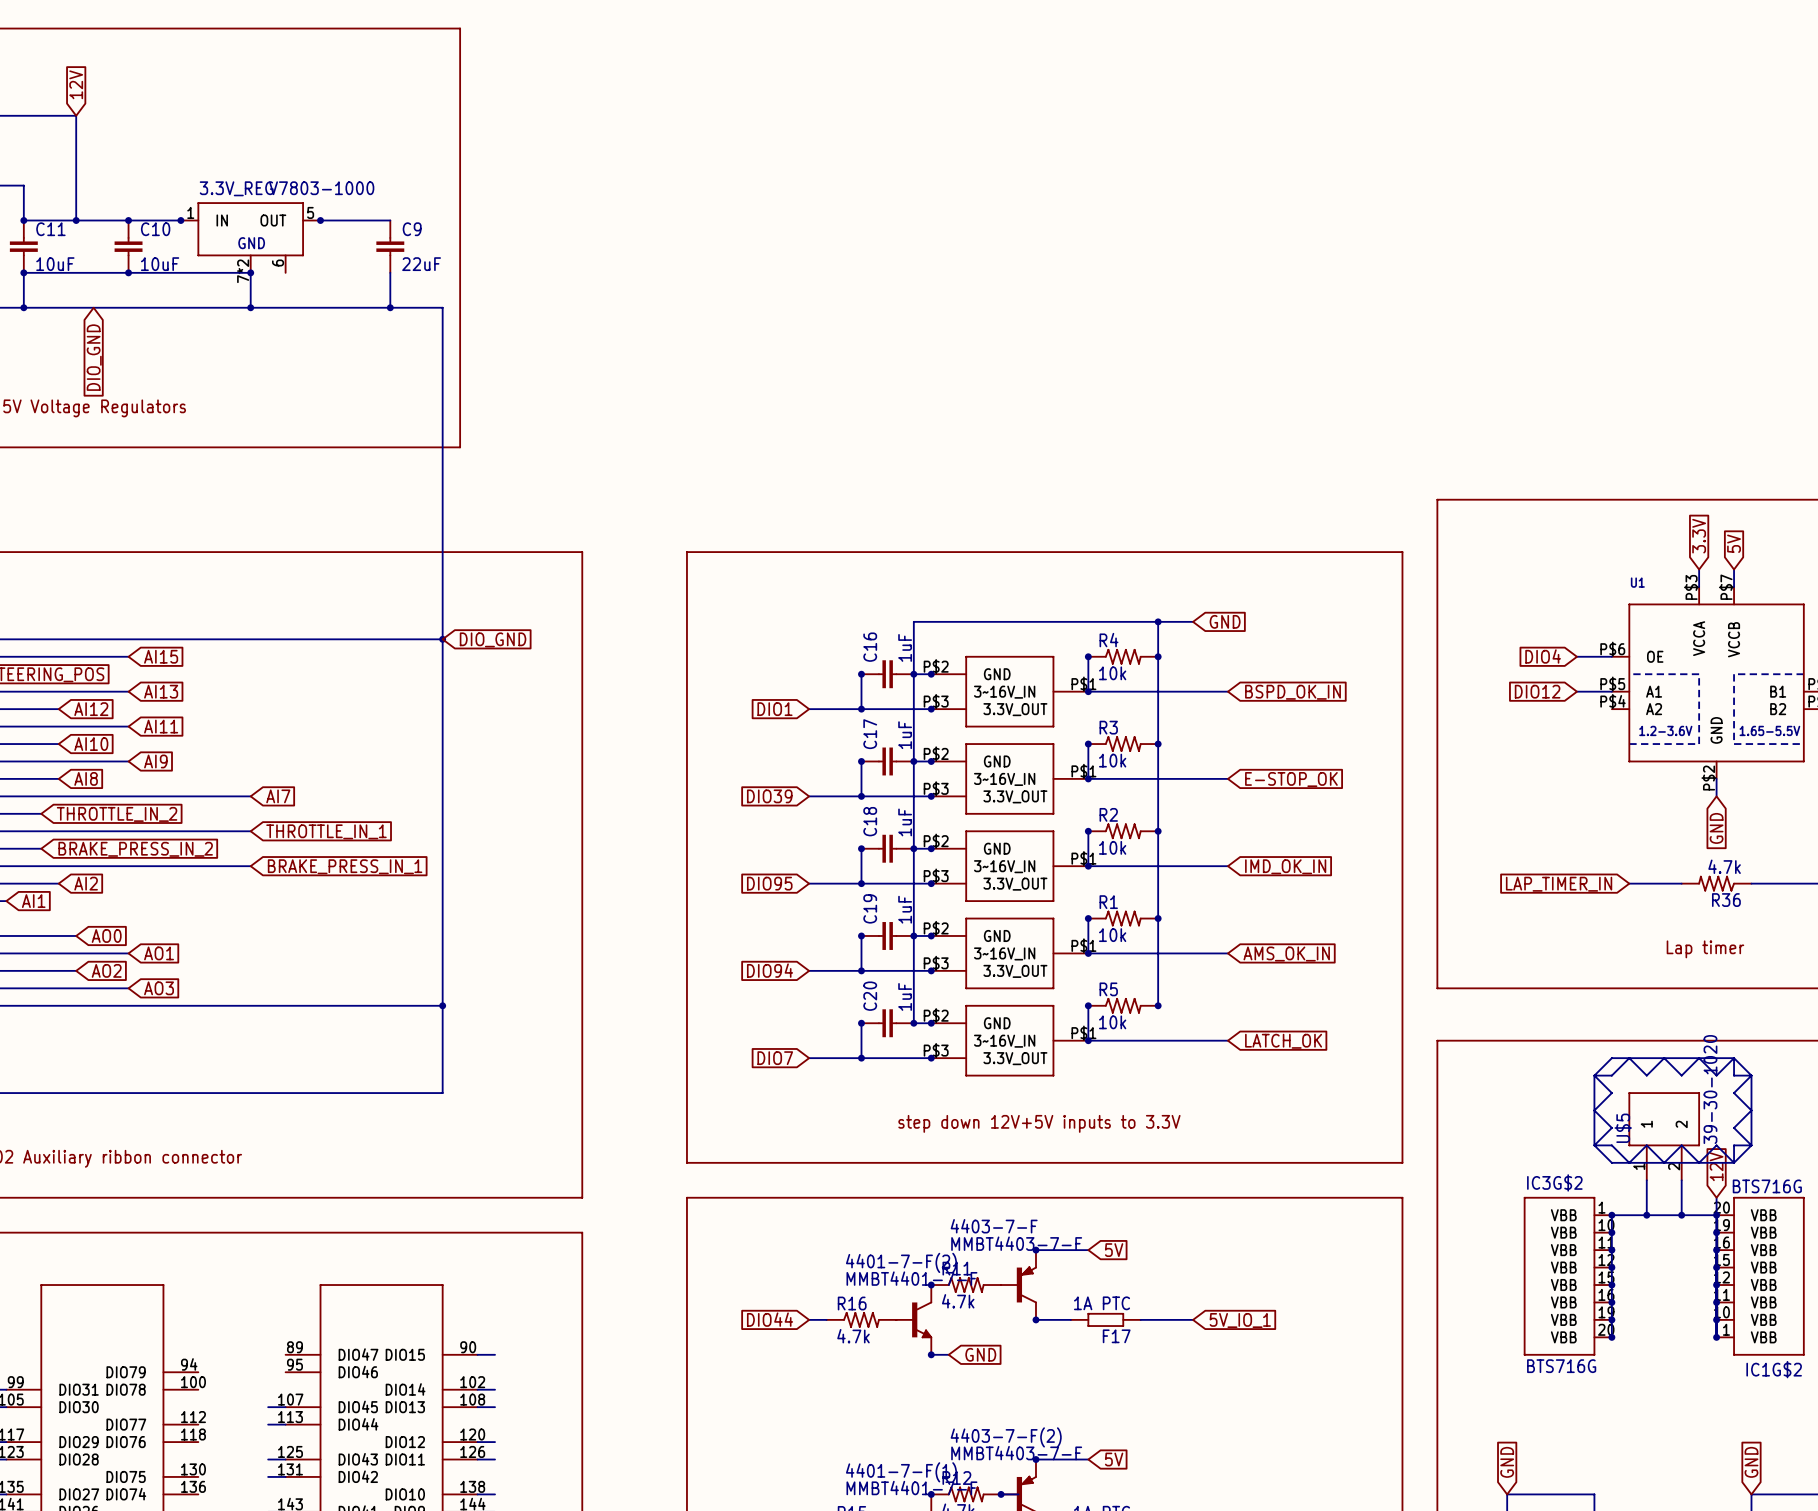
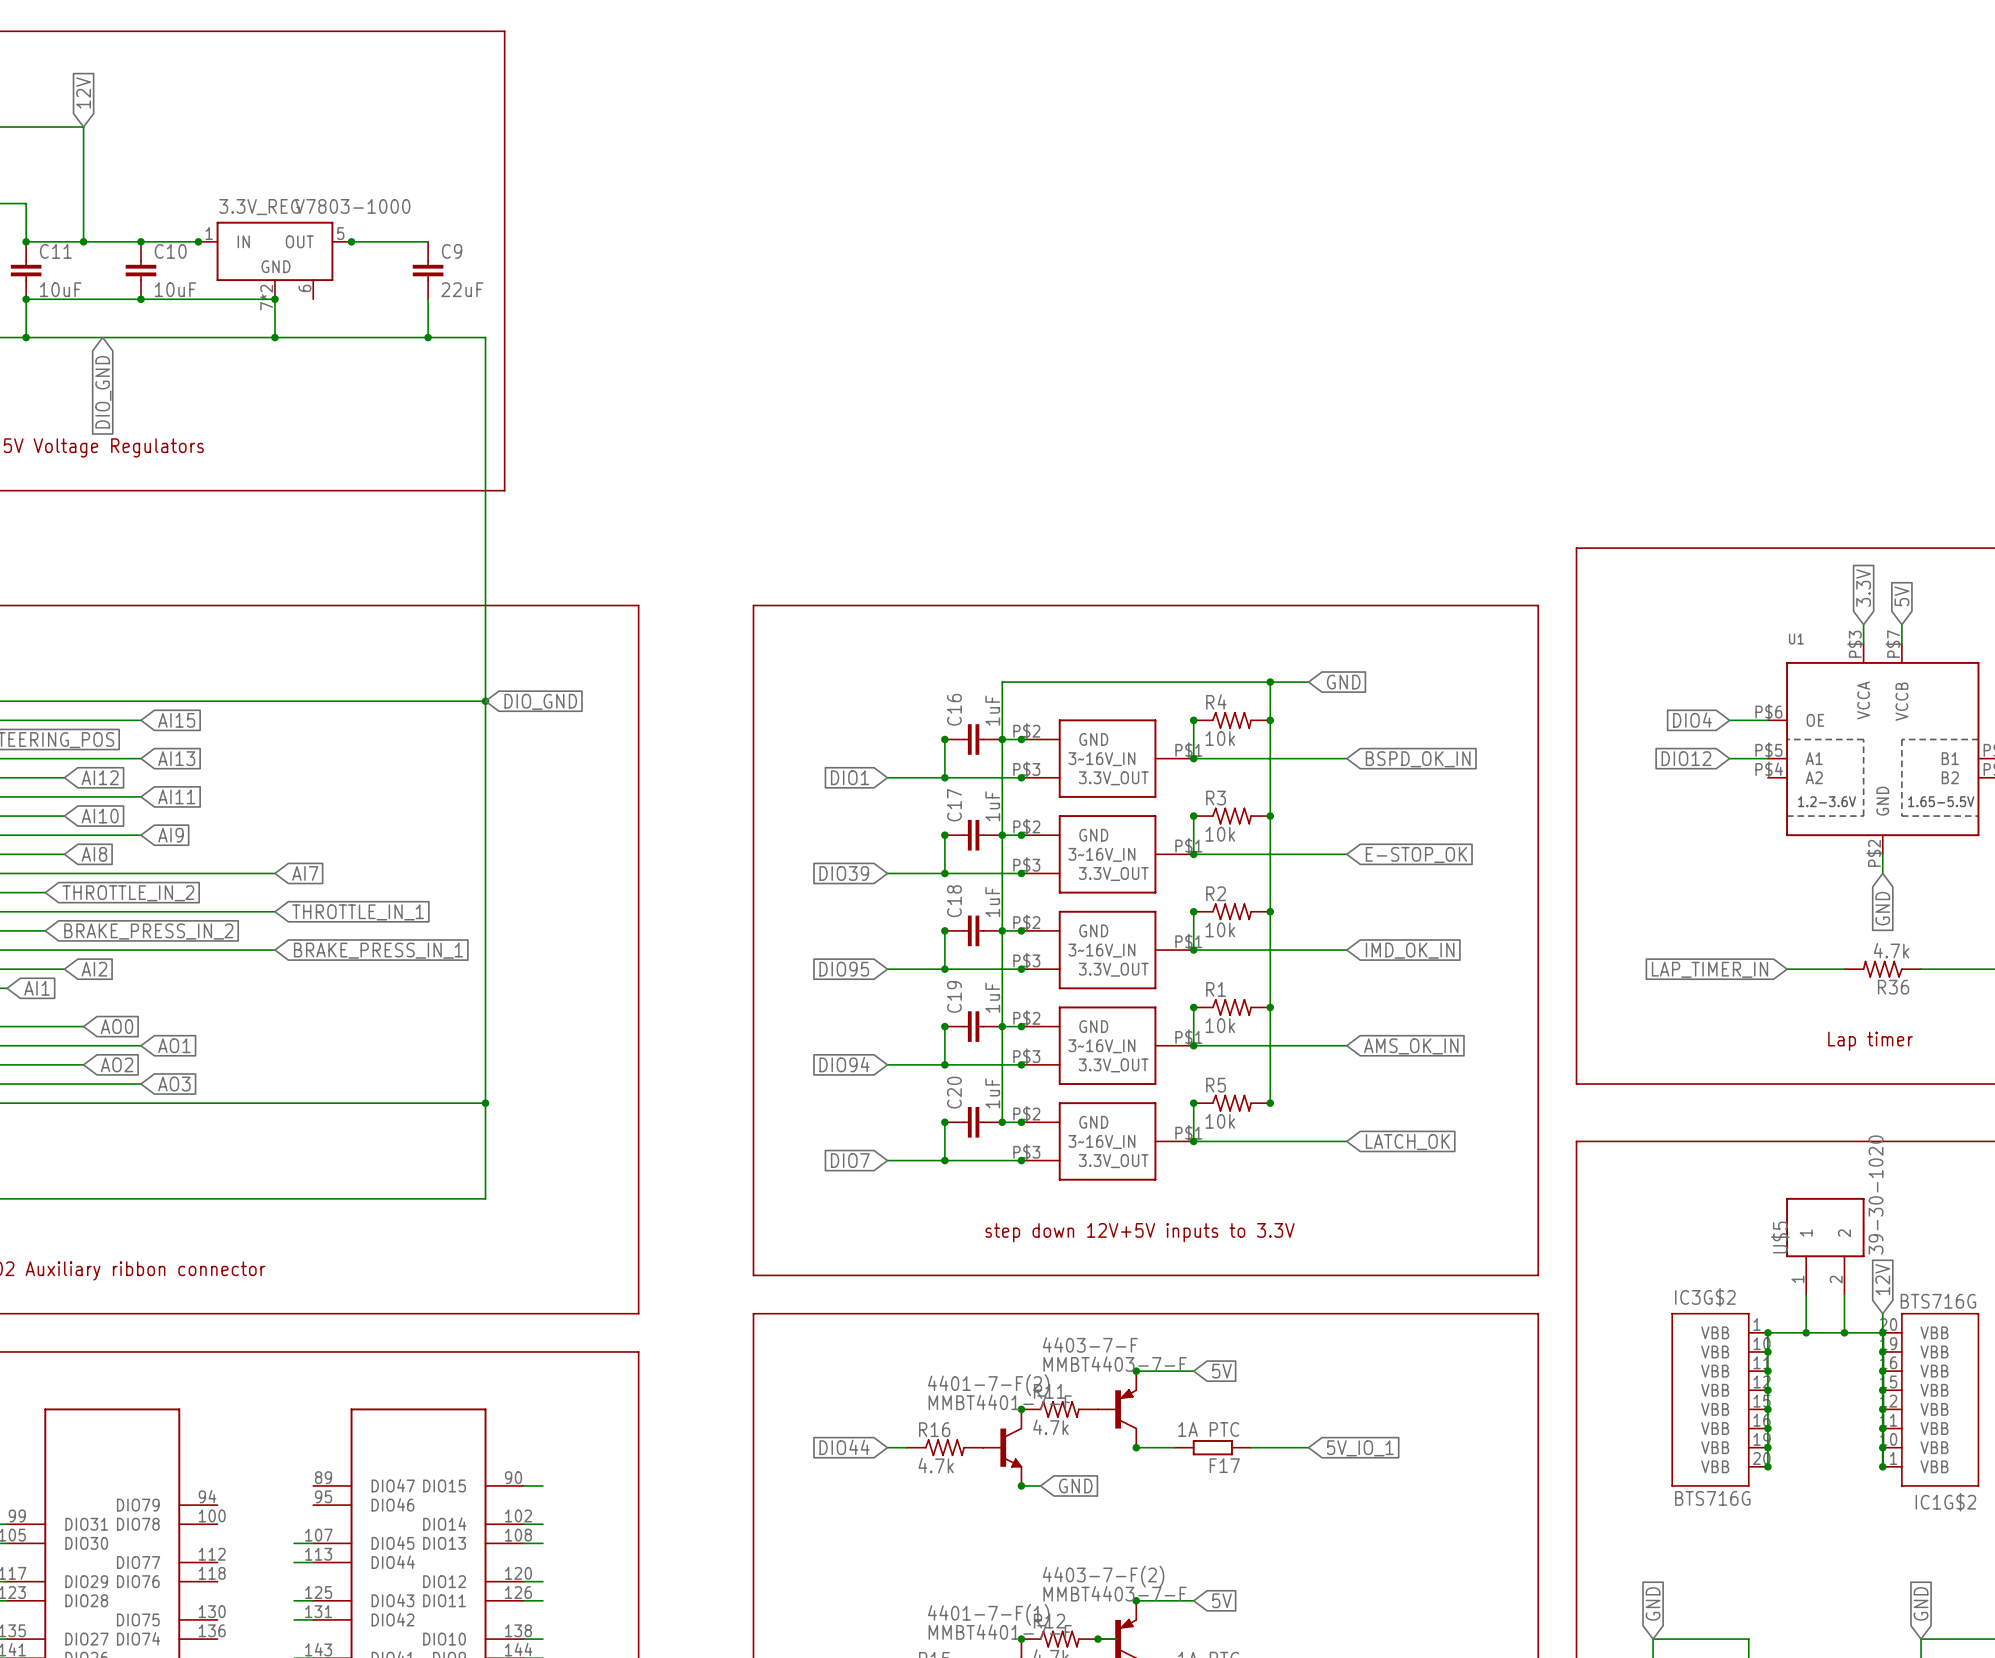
line: (1734, 1058) (1611, 1058) (1594, 1075) -> none
line: (1734, 1058) (1751, 1075) -> none
line: (1734, 1058) (1716, 1075) (1699, 1058) (1681, 1075) (1664, 1058) (1646, 1075) (1629, 1058) (1611, 1075) (1594, 1075) -> none
line: (1734, 1058) (1734, 1075) (1751, 1075) -> none
line: (1594, 1075) (1594, 1145) -> none
line: (1594, 1075) (1611, 1093) (1594, 1110) (1611, 1127) (1594, 1145) -> none
line: (1751, 1075) (1751, 1145) -> none
line: (1751, 1075) (1734, 1093) (1751, 1110) (1734, 1127) (1751, 1145) -> none
line: (1594, 1145) (1611, 1162) (1734, 1162) -> none
line: (1594, 1145) (1611, 1145) (1629, 1162) (1646, 1145) (1664, 1162) (1681, 1145) (1699, 1162) (1716, 1145) (1734, 1162) -> none
line: (1751, 1145) (1734, 1162) -> none
line: (1751, 1145) (1734, 1145) (1734, 1162) -> none

